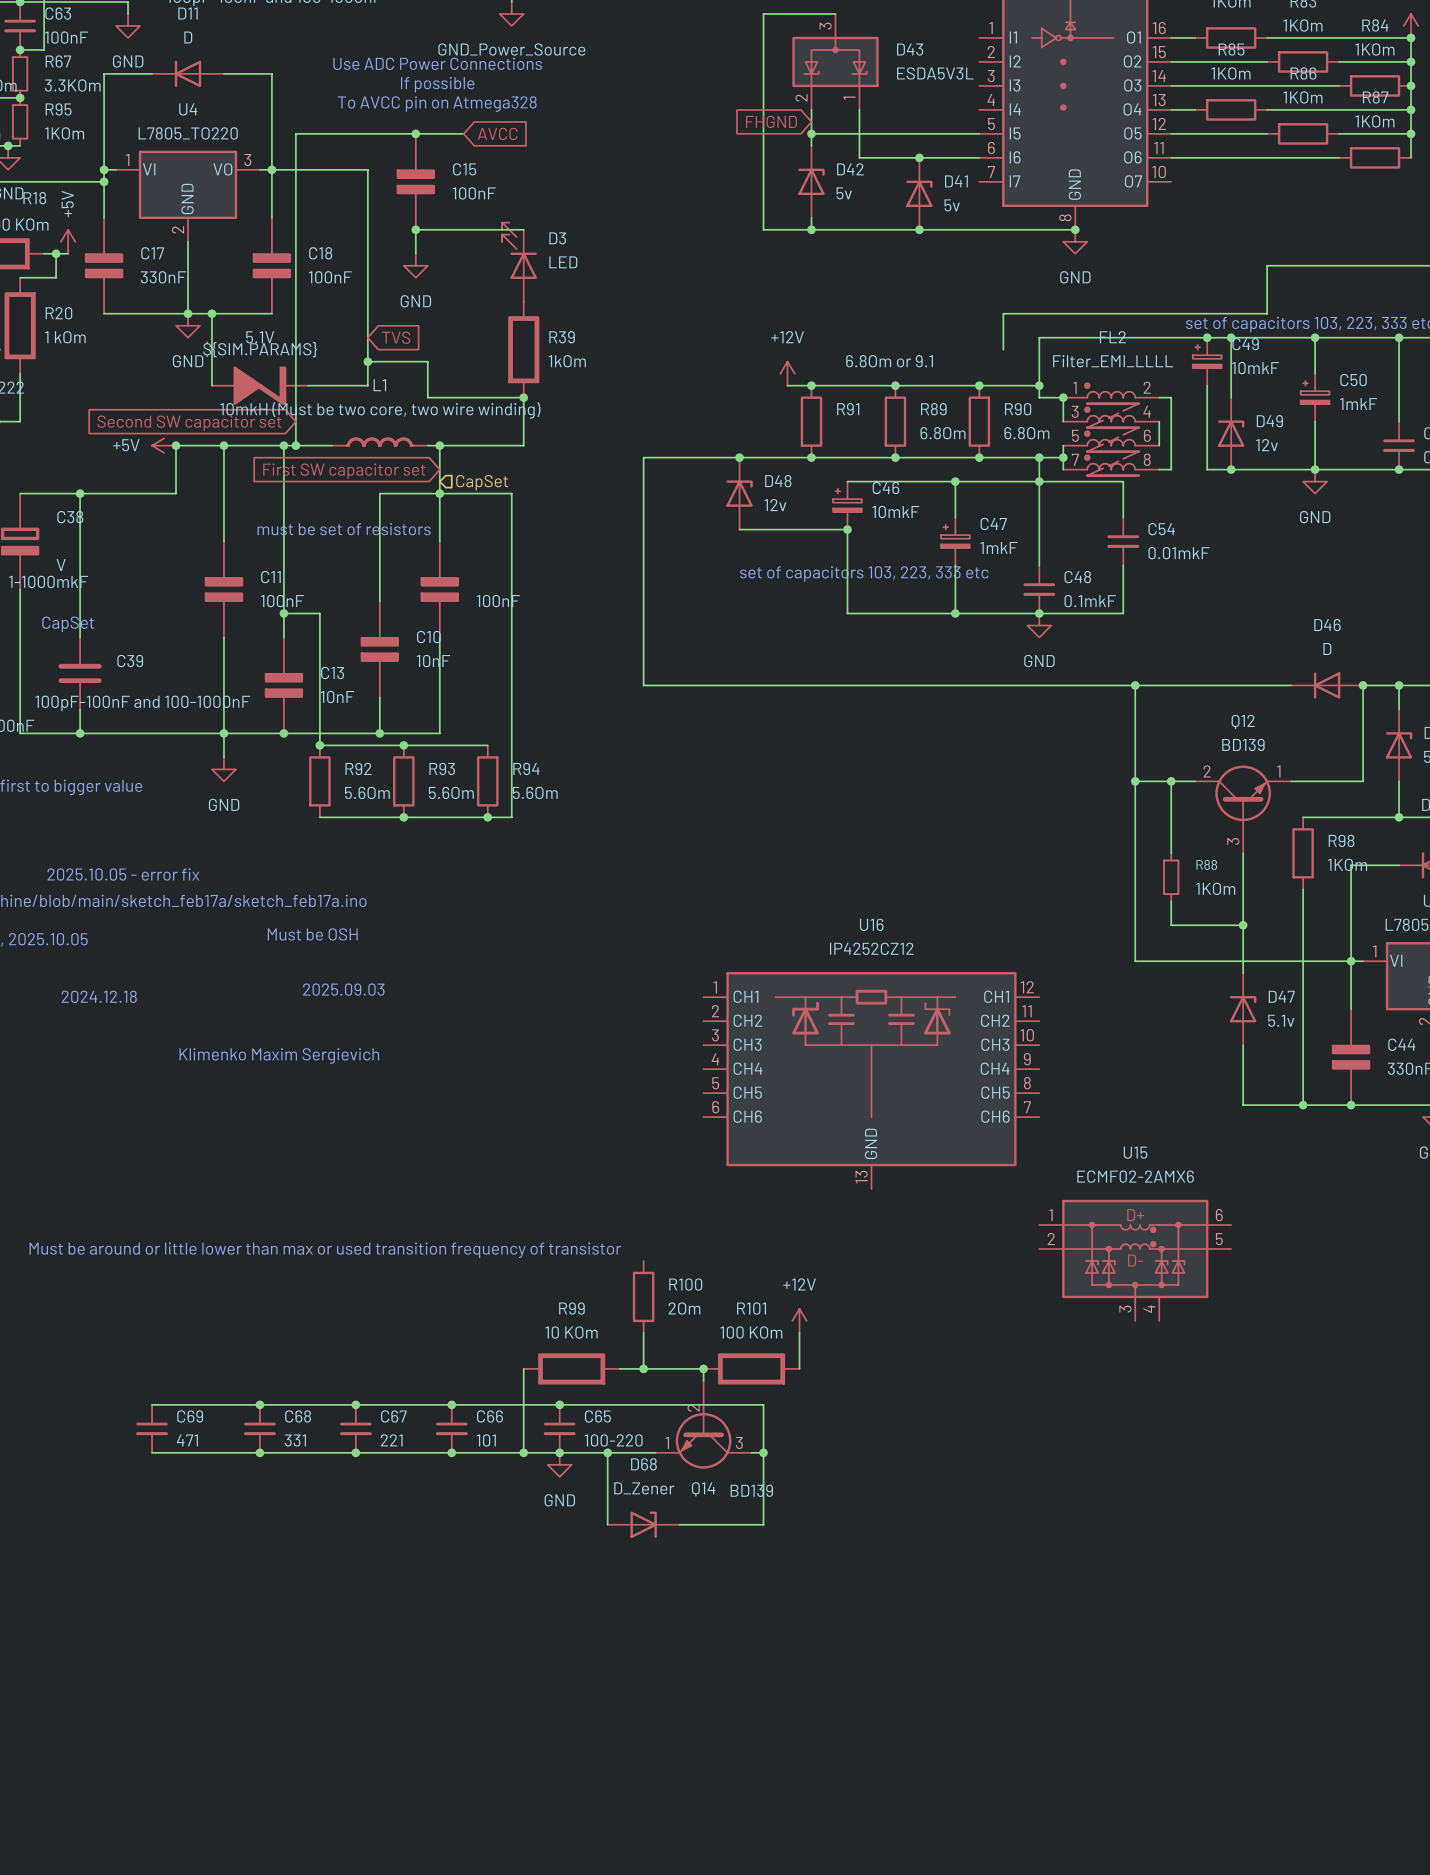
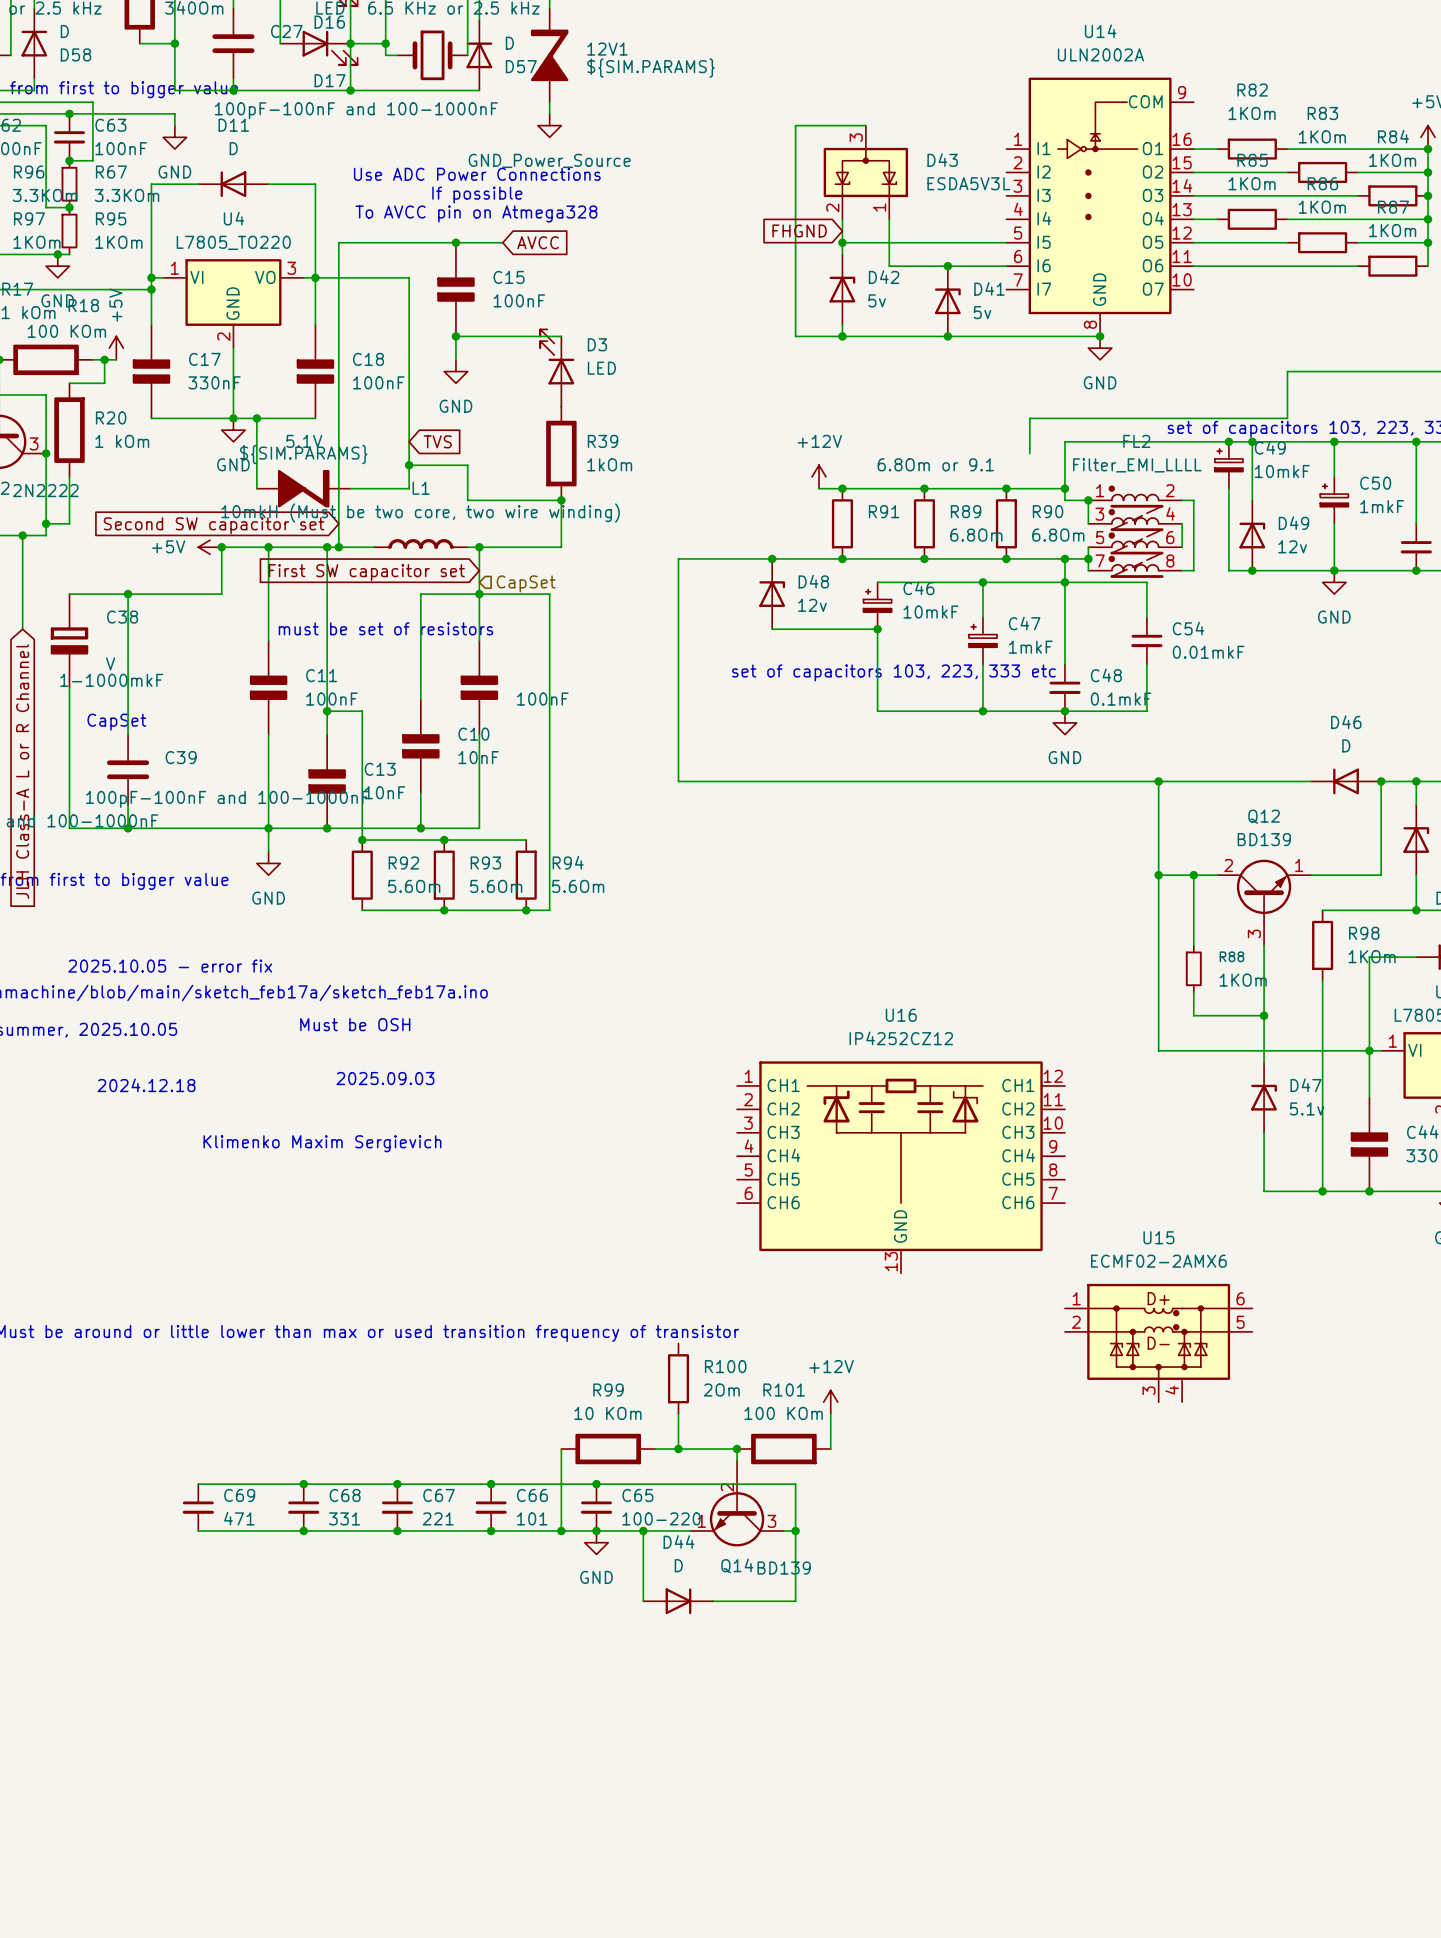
D68: D_Zener (643, 1524) -> none
D44: none -> D (678, 1601)

